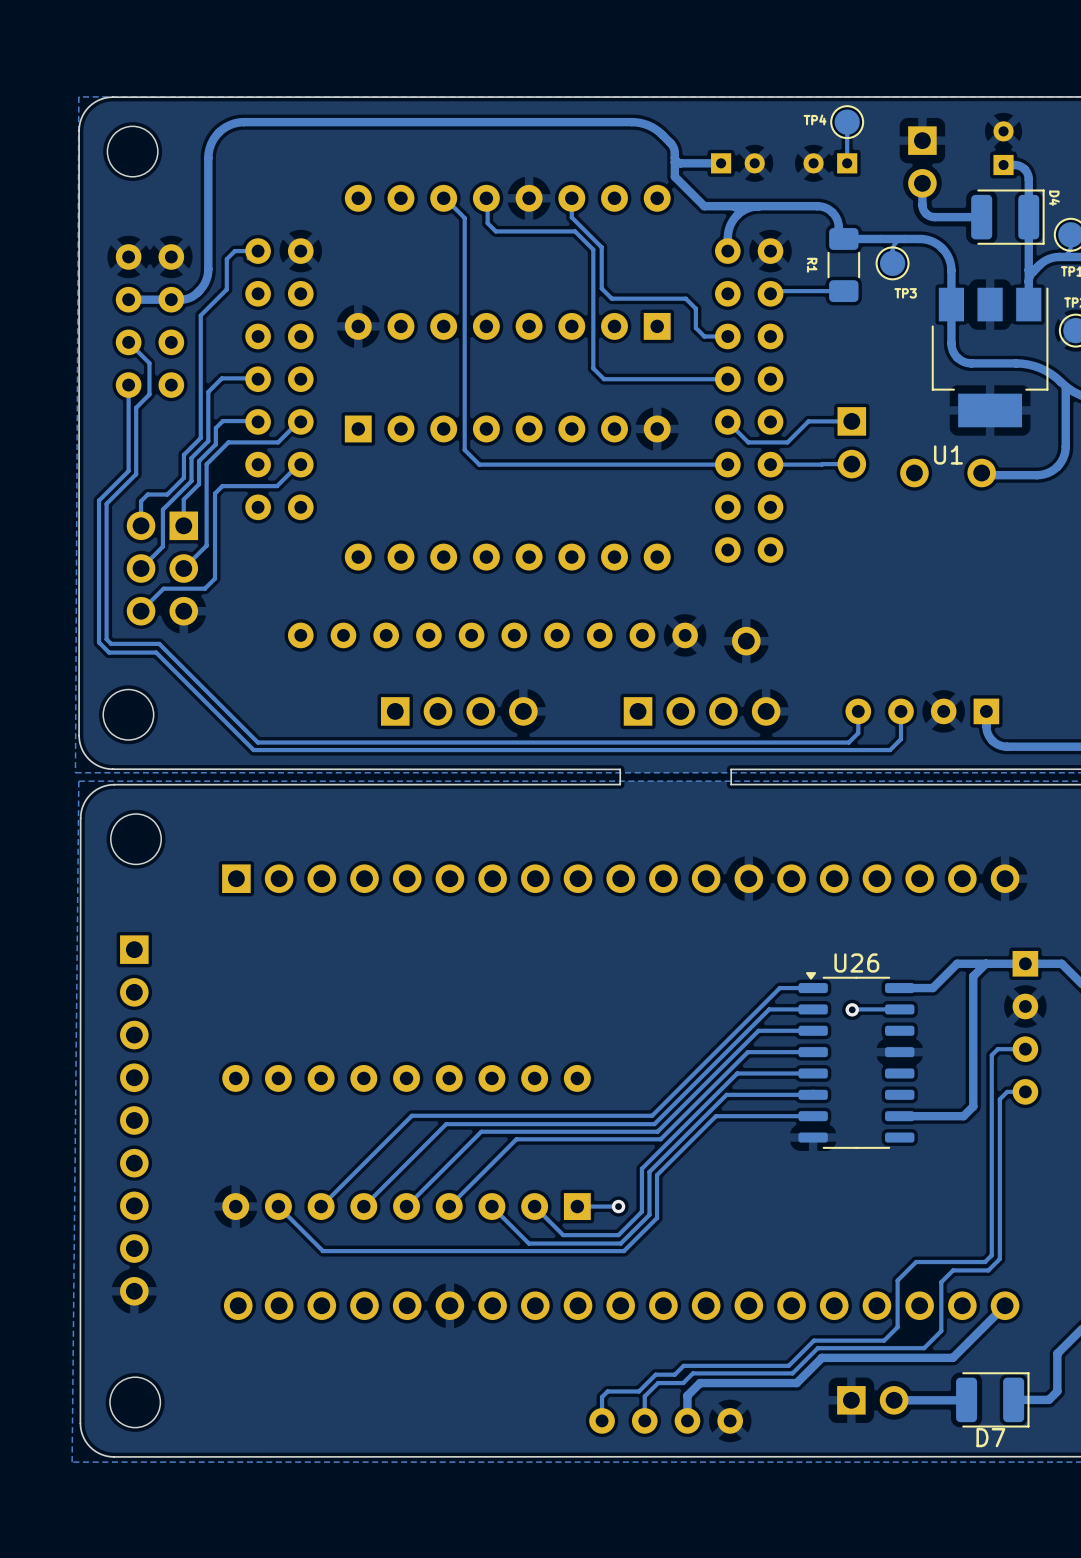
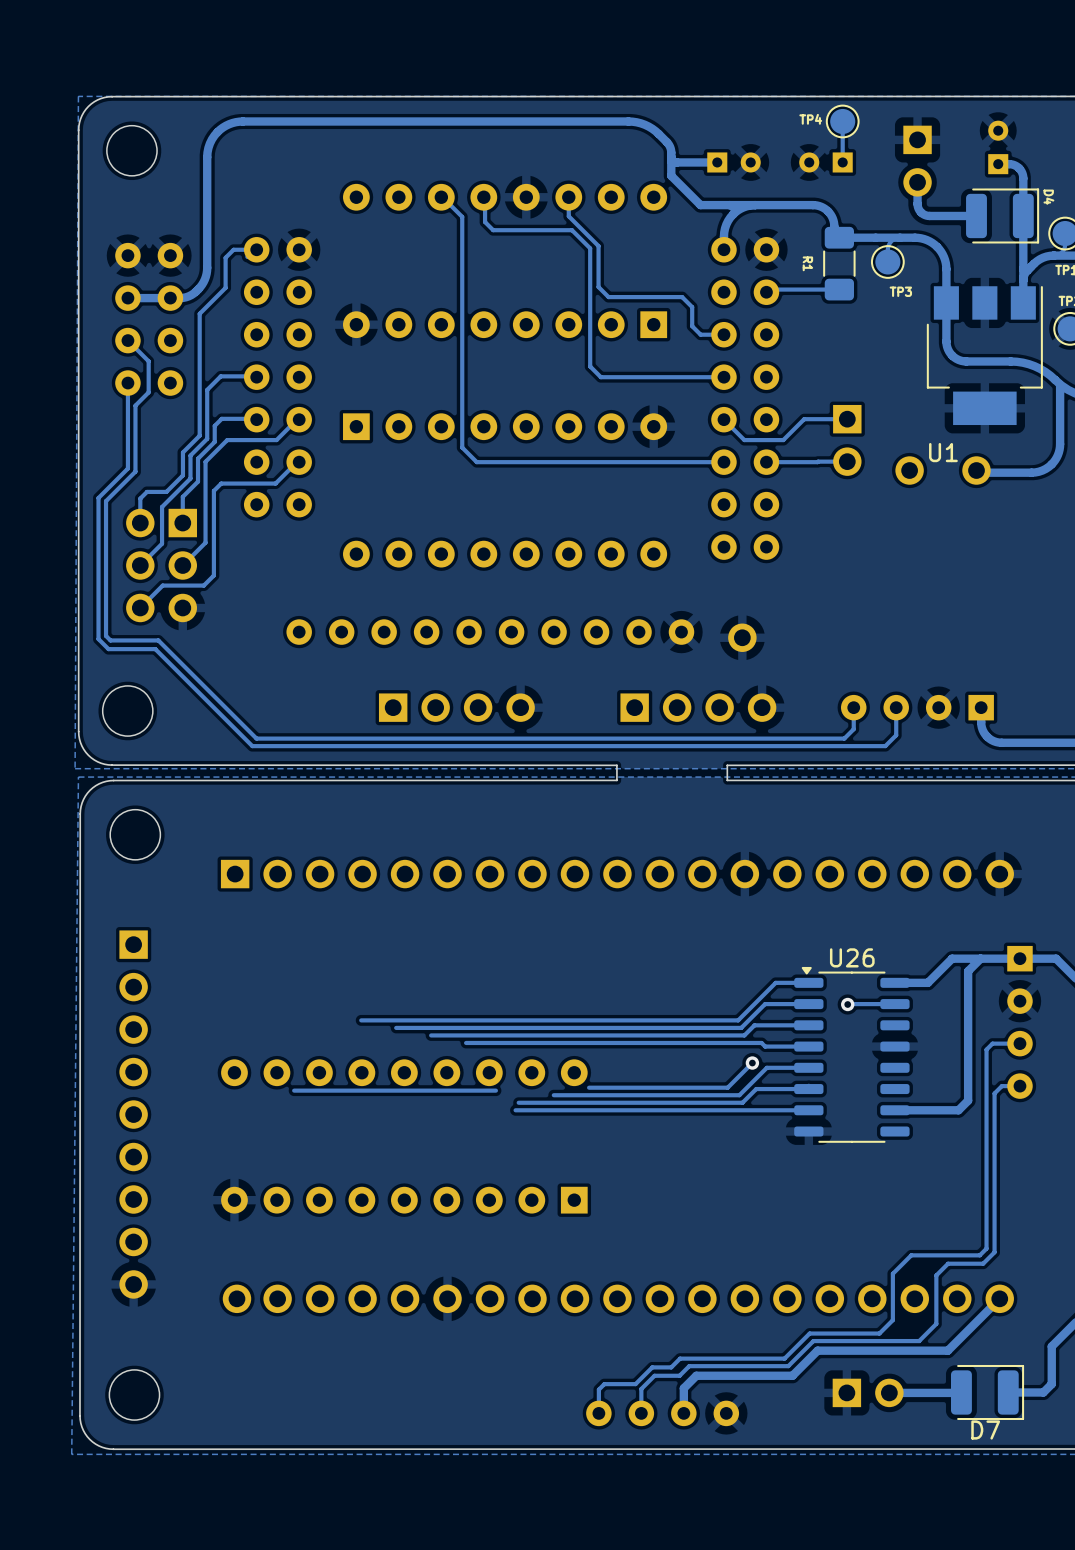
track: (742, 1025) (652, 1115) (411, 1115) (321, 1206) -> (738, 1020) (361, 1020)
track: (745, 1033) (654, 1124) (446, 1124) (363, 1206) -> (741, 1027) (396, 1027)
track: (748, 1040) (657, 1131) (481, 1131) (406, 1206) -> (744, 1035) (431, 1035)
track: (769, 1052) (747, 1052) (660, 1139) (516, 1139) (449, 1206) -> (765, 1046) (761, 1042) (466, 1042)
track: none -> (752, 1063) (727, 1087) (589, 1087)
via: none -> (752, 1063)
track: (770, 1073) (737, 1073) (641, 1168) (641, 1211) (618, 1235) (563, 1235) (534, 1206) -> (766, 1067) (739, 1095) (553, 1095)
track: (760, 1094) (726, 1094) (649, 1171) (649, 1214) (620, 1243) (528, 1243) (491, 1206) -> (756, 1089) (742, 1102) (518, 1102)
track: none -> (495, 1090) (294, 1090)
track: (715, 1116) (657, 1175) (657, 1218) (623, 1251) (322, 1251) (278, 1206) -> (712, 1110) (515, 1110)
track: (618, 1206) (577, 1206) -> none
via: (618, 1206) -> none

